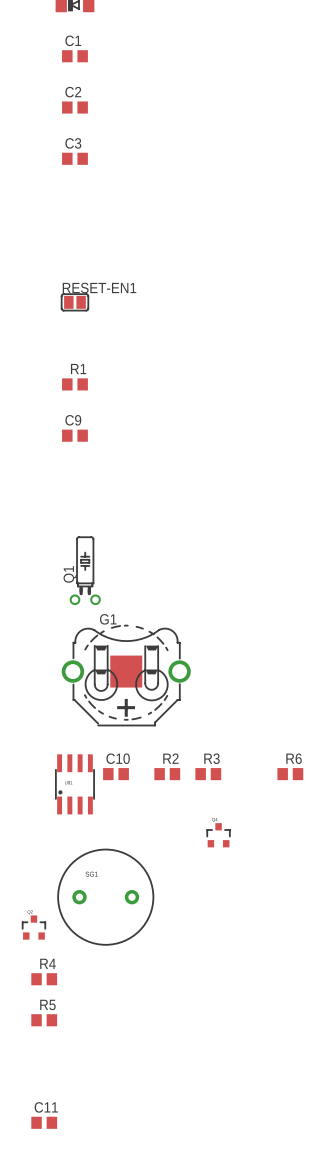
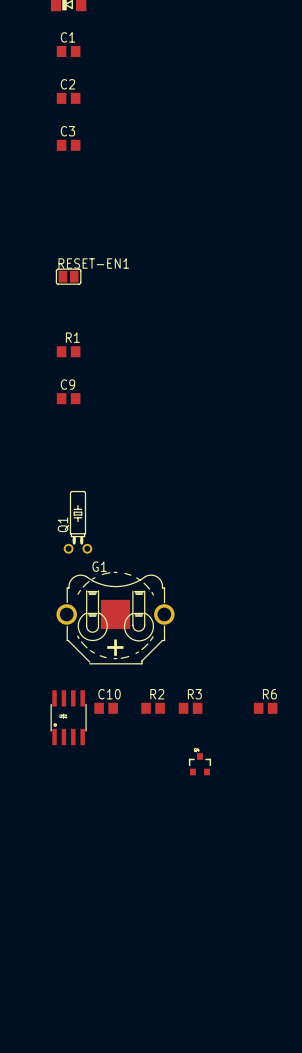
part: (105, 897) -> none
part: (33, 927) -> none
R4: (44, 979) -> none
R5: (44, 1020) -> none
C11: (44, 1122) -> none

